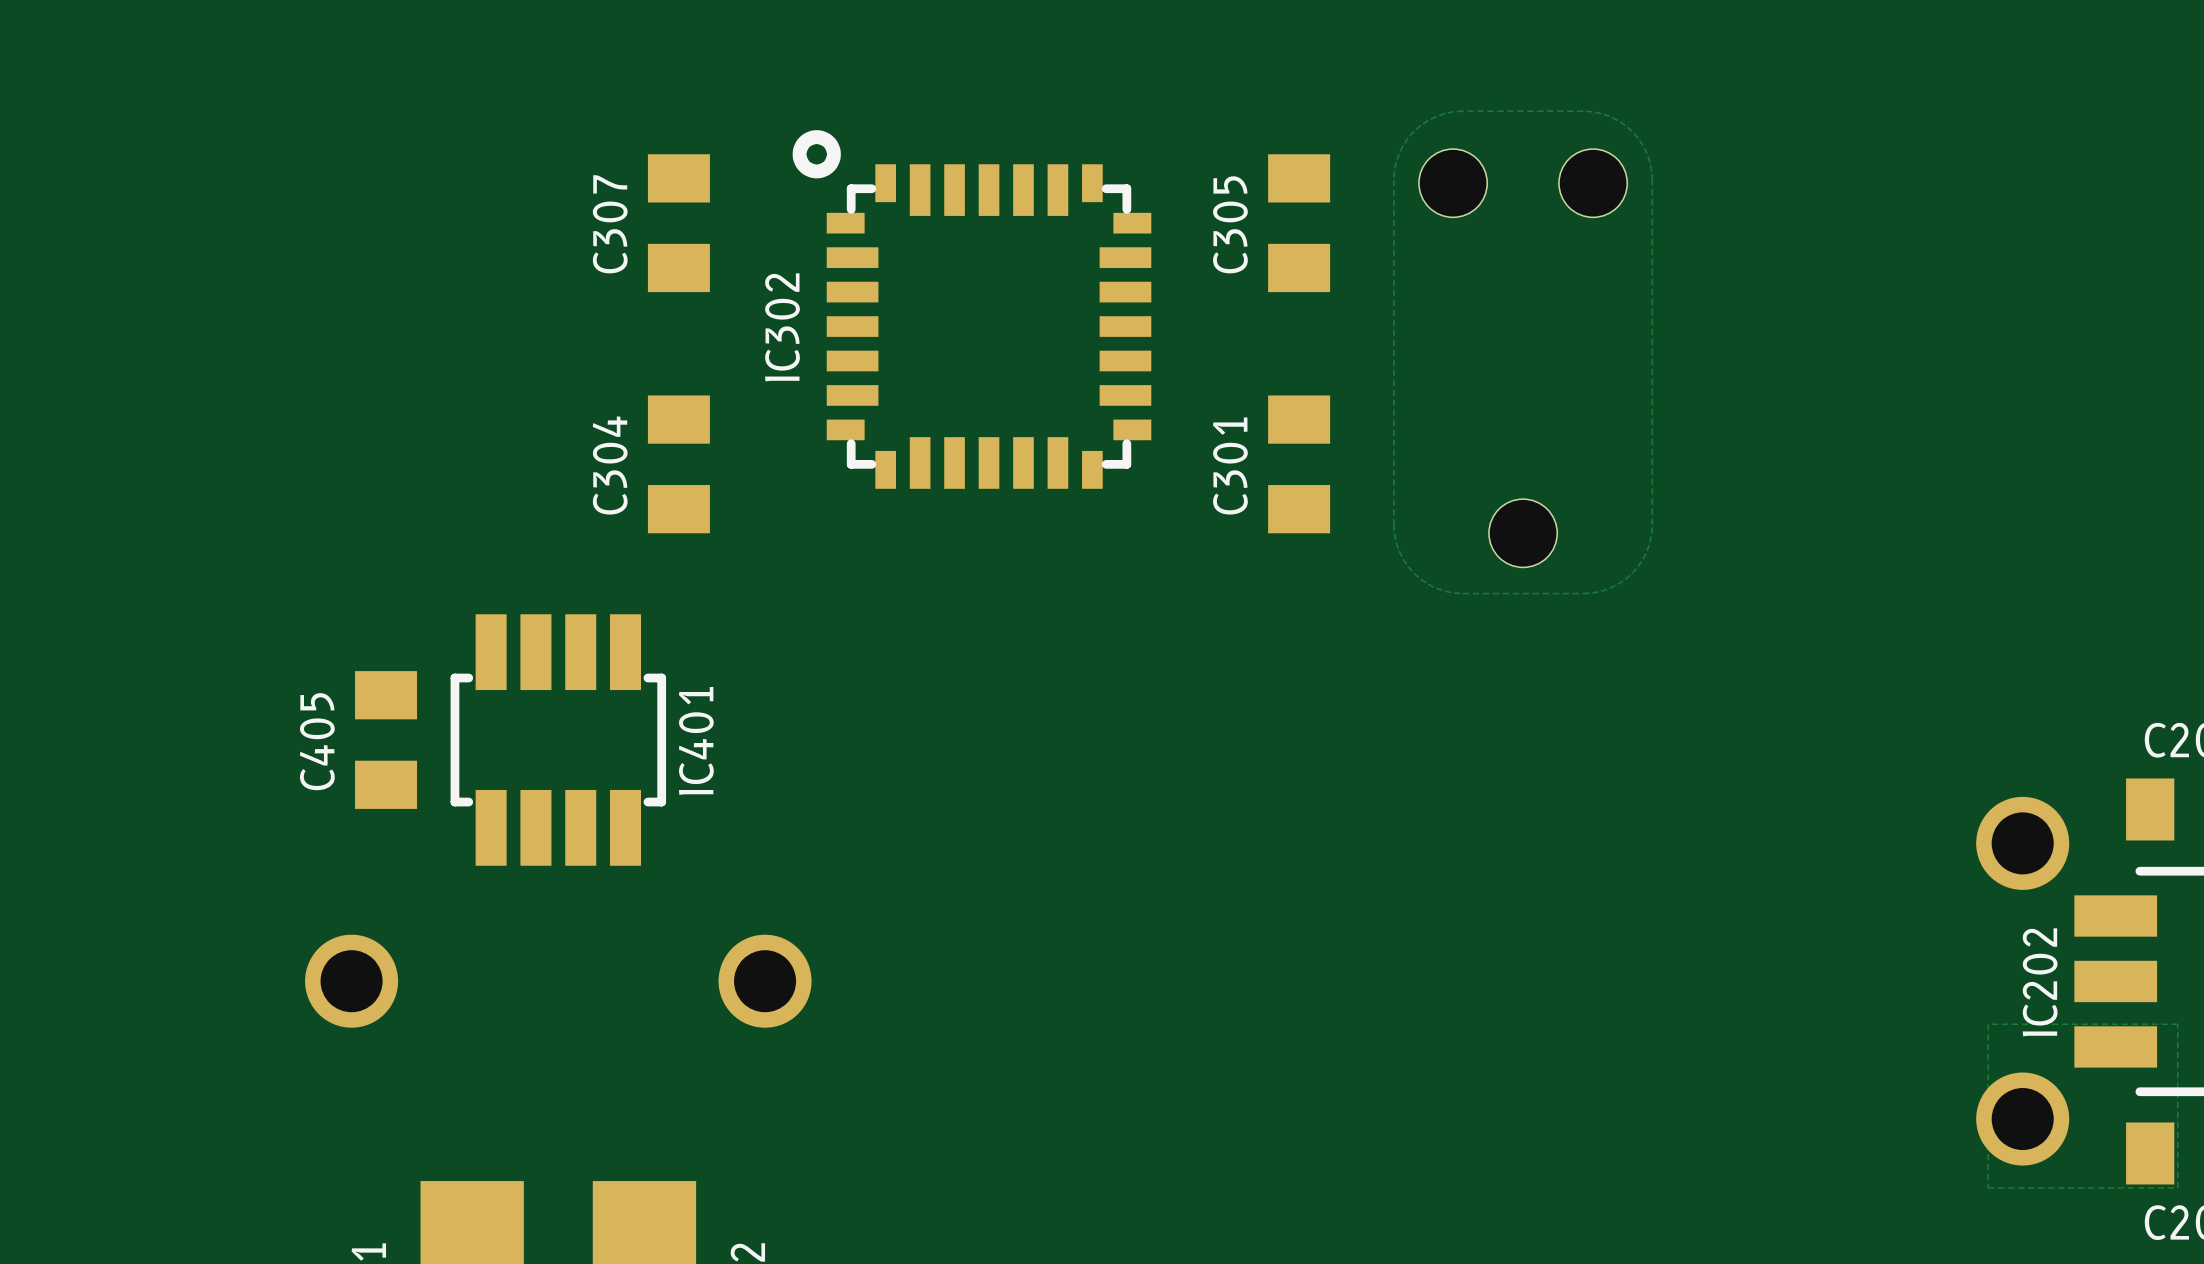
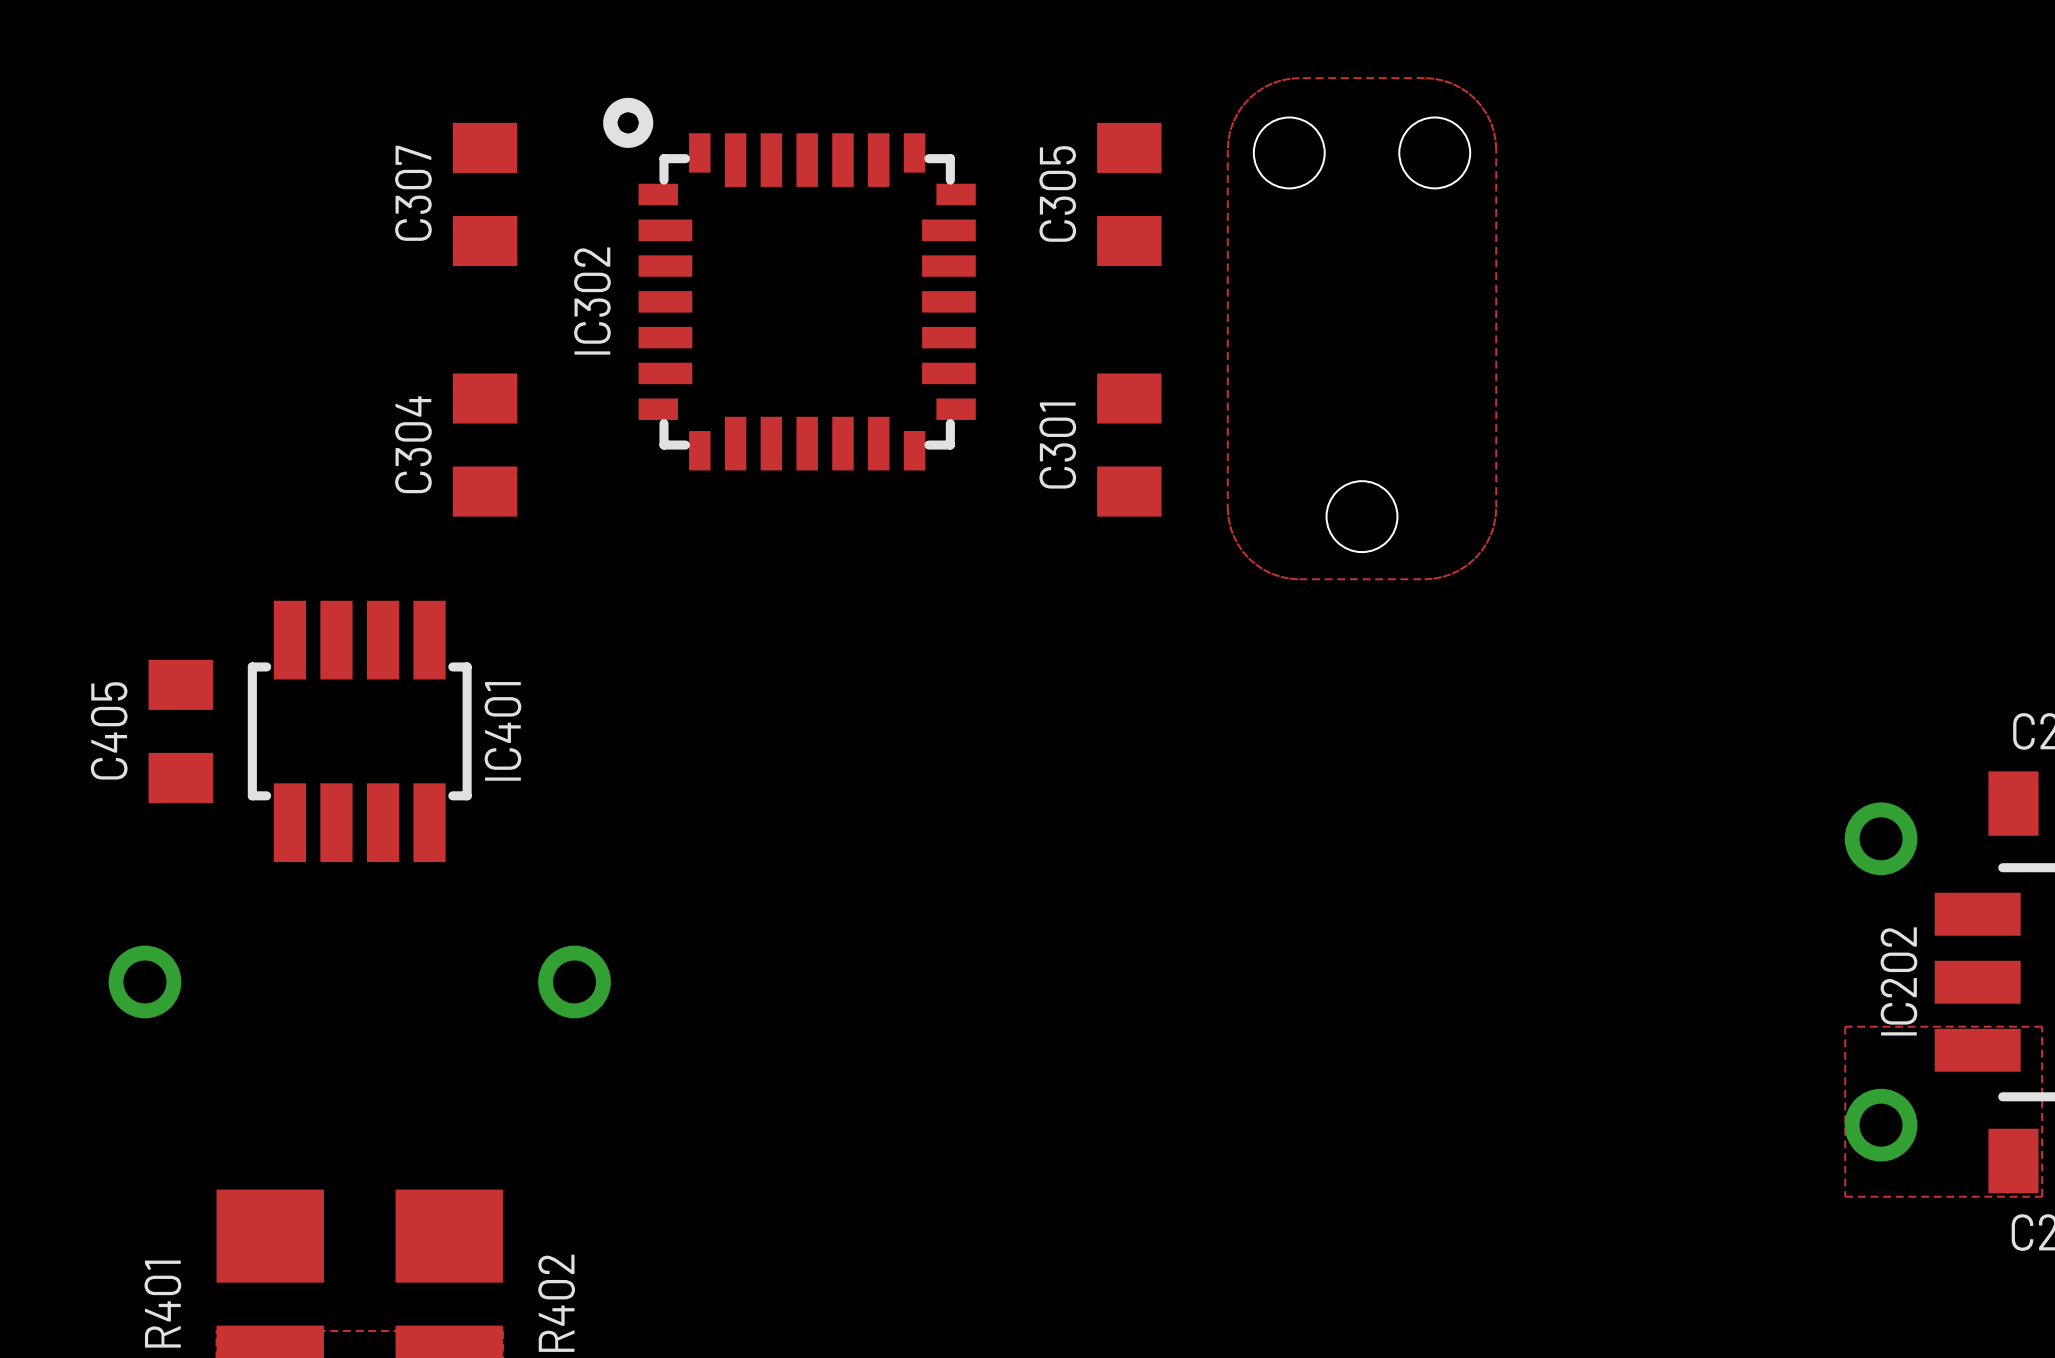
part footprint: [1976, 796, 2070, 890] -> [1844, 802, 1918, 876]
part footprint: [305, 934, 399, 1028] -> [108, 945, 182, 1019]
part footprint: [718, 934, 812, 1028] -> [538, 945, 611, 1019]
part footprint: [1976, 1072, 2070, 1166] -> [1844, 1088, 1918, 1162]

